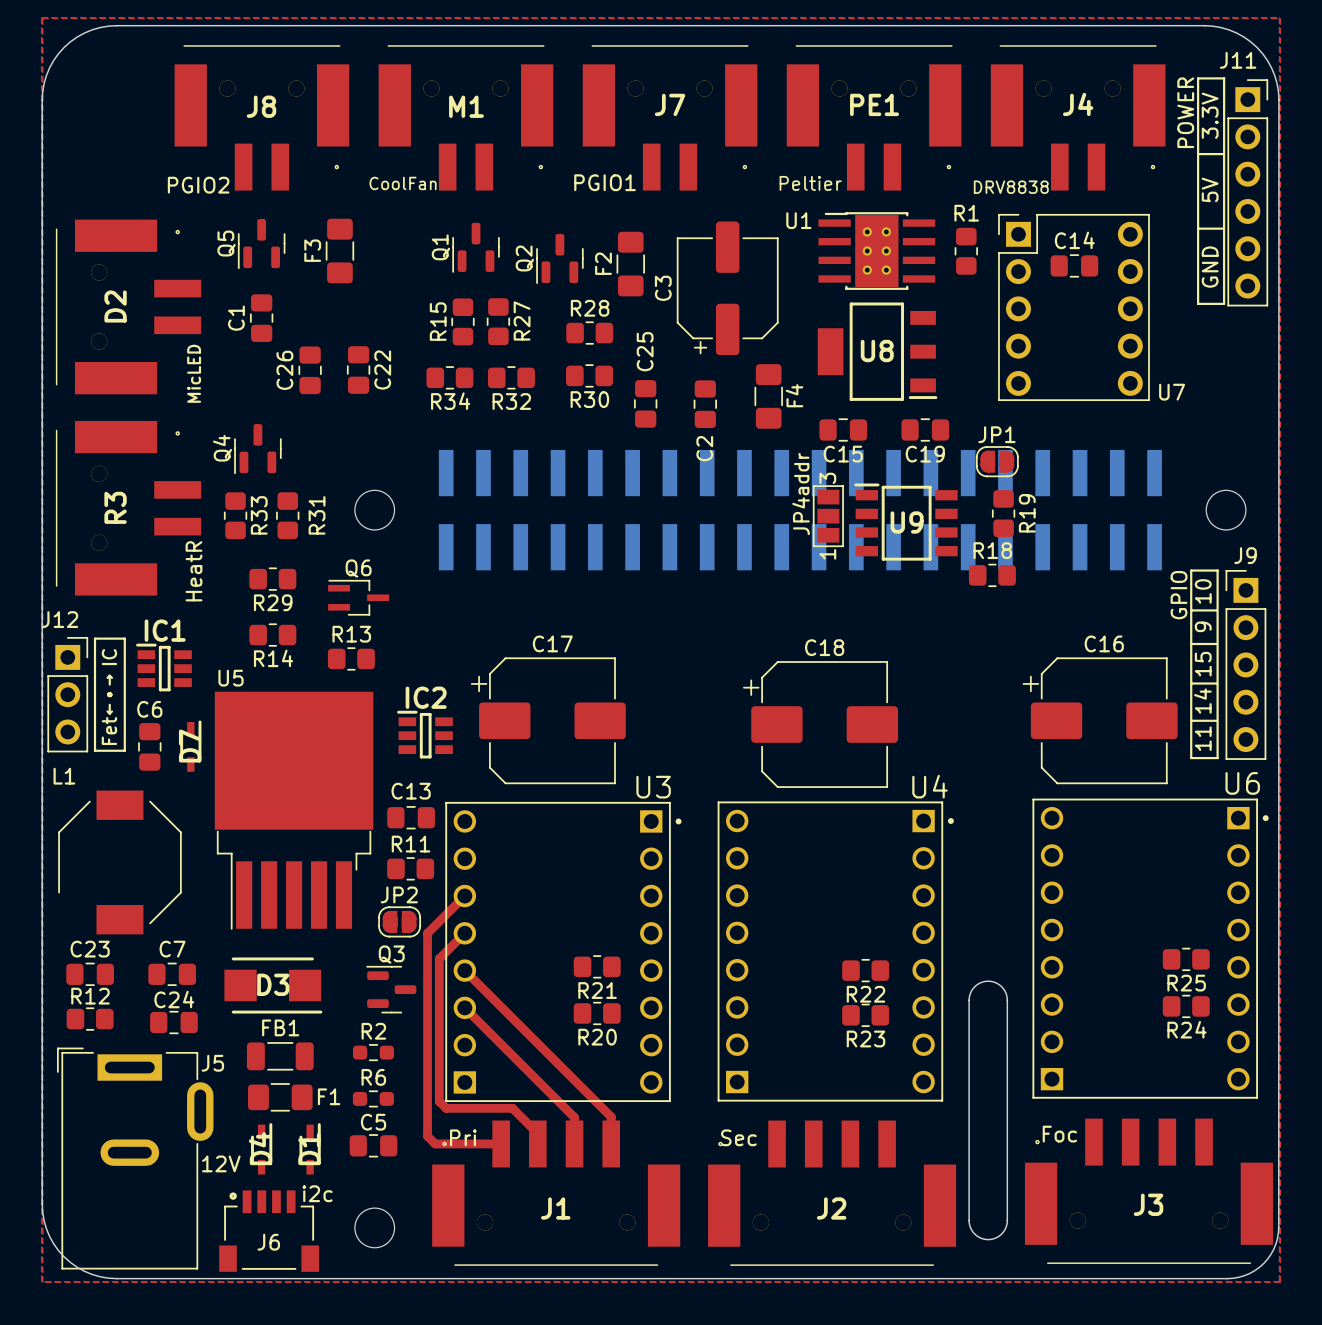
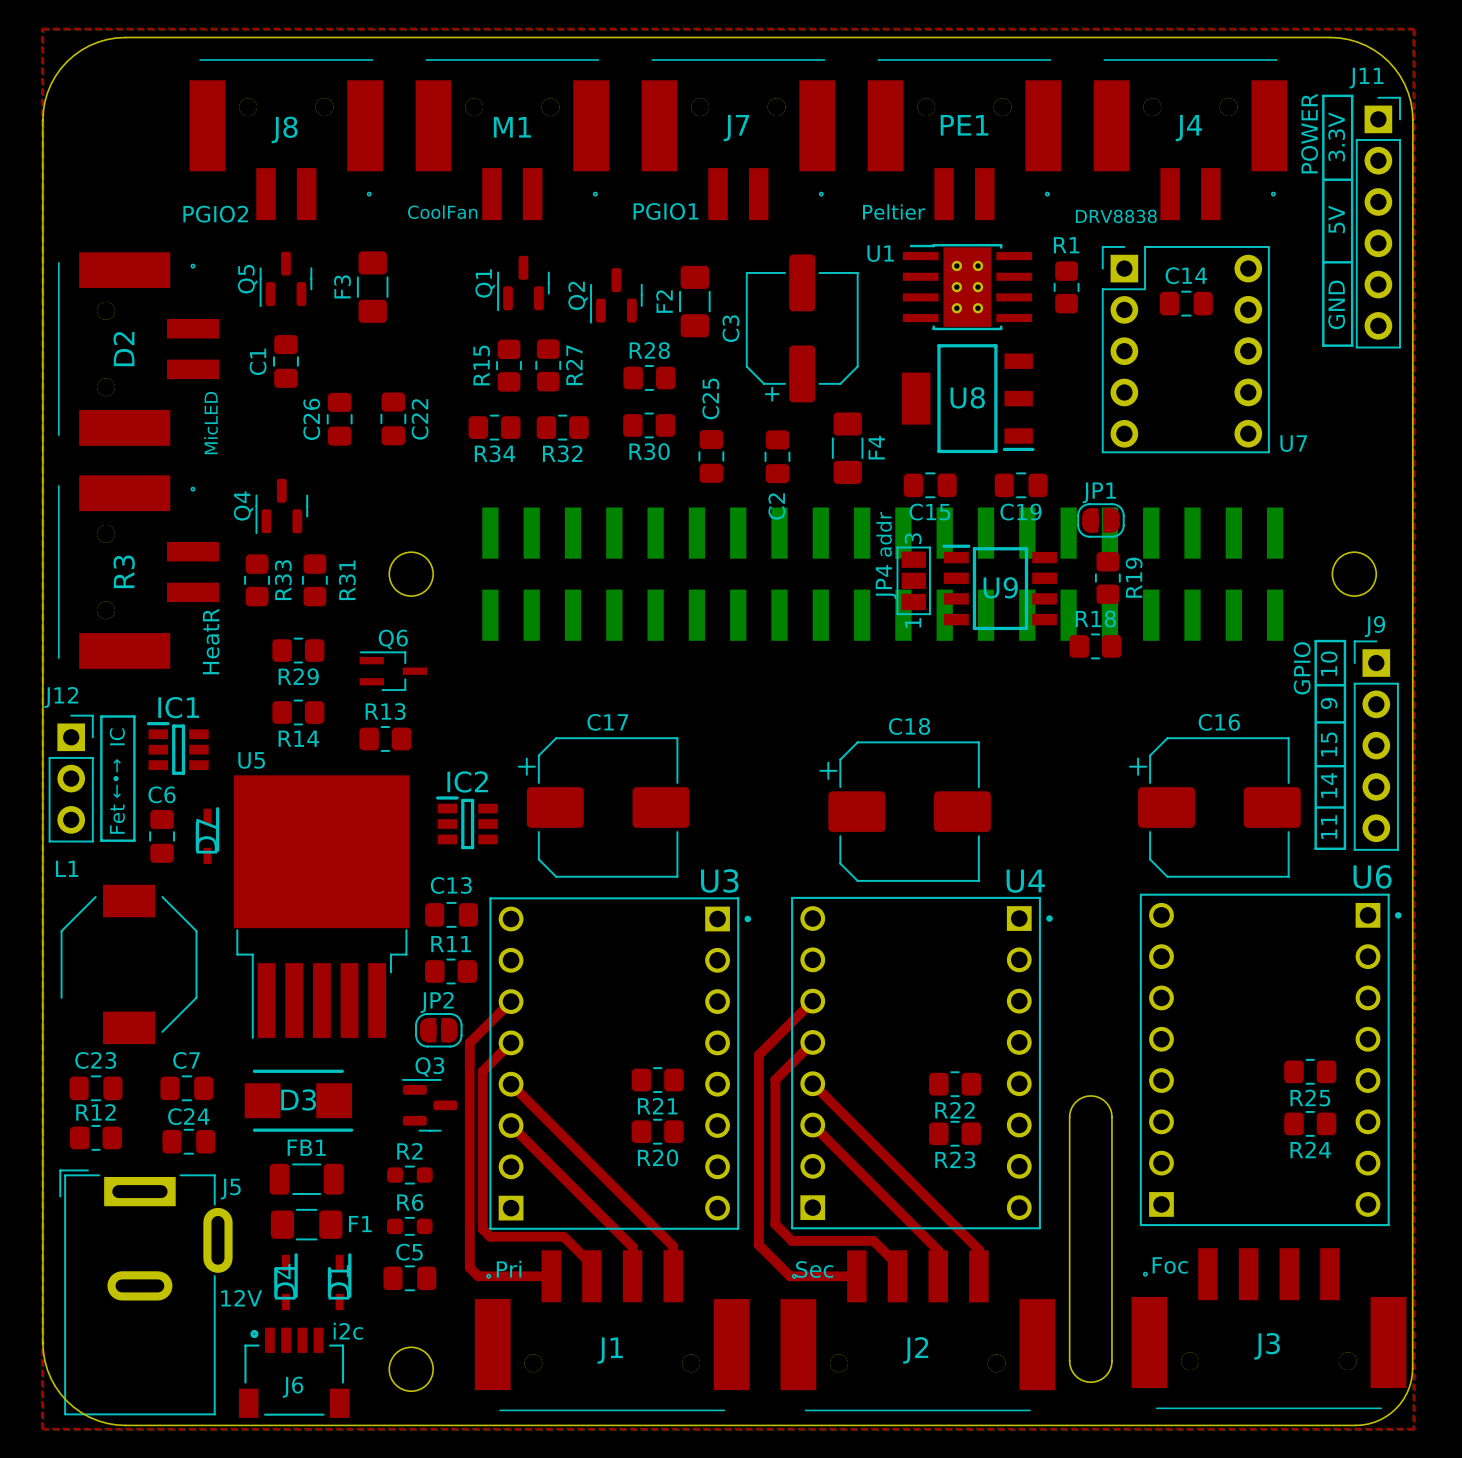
top track: none -> (812, 1001) (758, 1055) (758, 1245) (790, 1276) (856, 1276)
top track: none -> (812, 1042) (775, 1079) (775, 1224) (791, 1240) (873, 1240) (897, 1264) (897, 1276)
top track: none -> (812, 1083) (978, 1249) (978, 1276)
top track: none -> (812, 1125) (938, 1250) (938, 1276)

